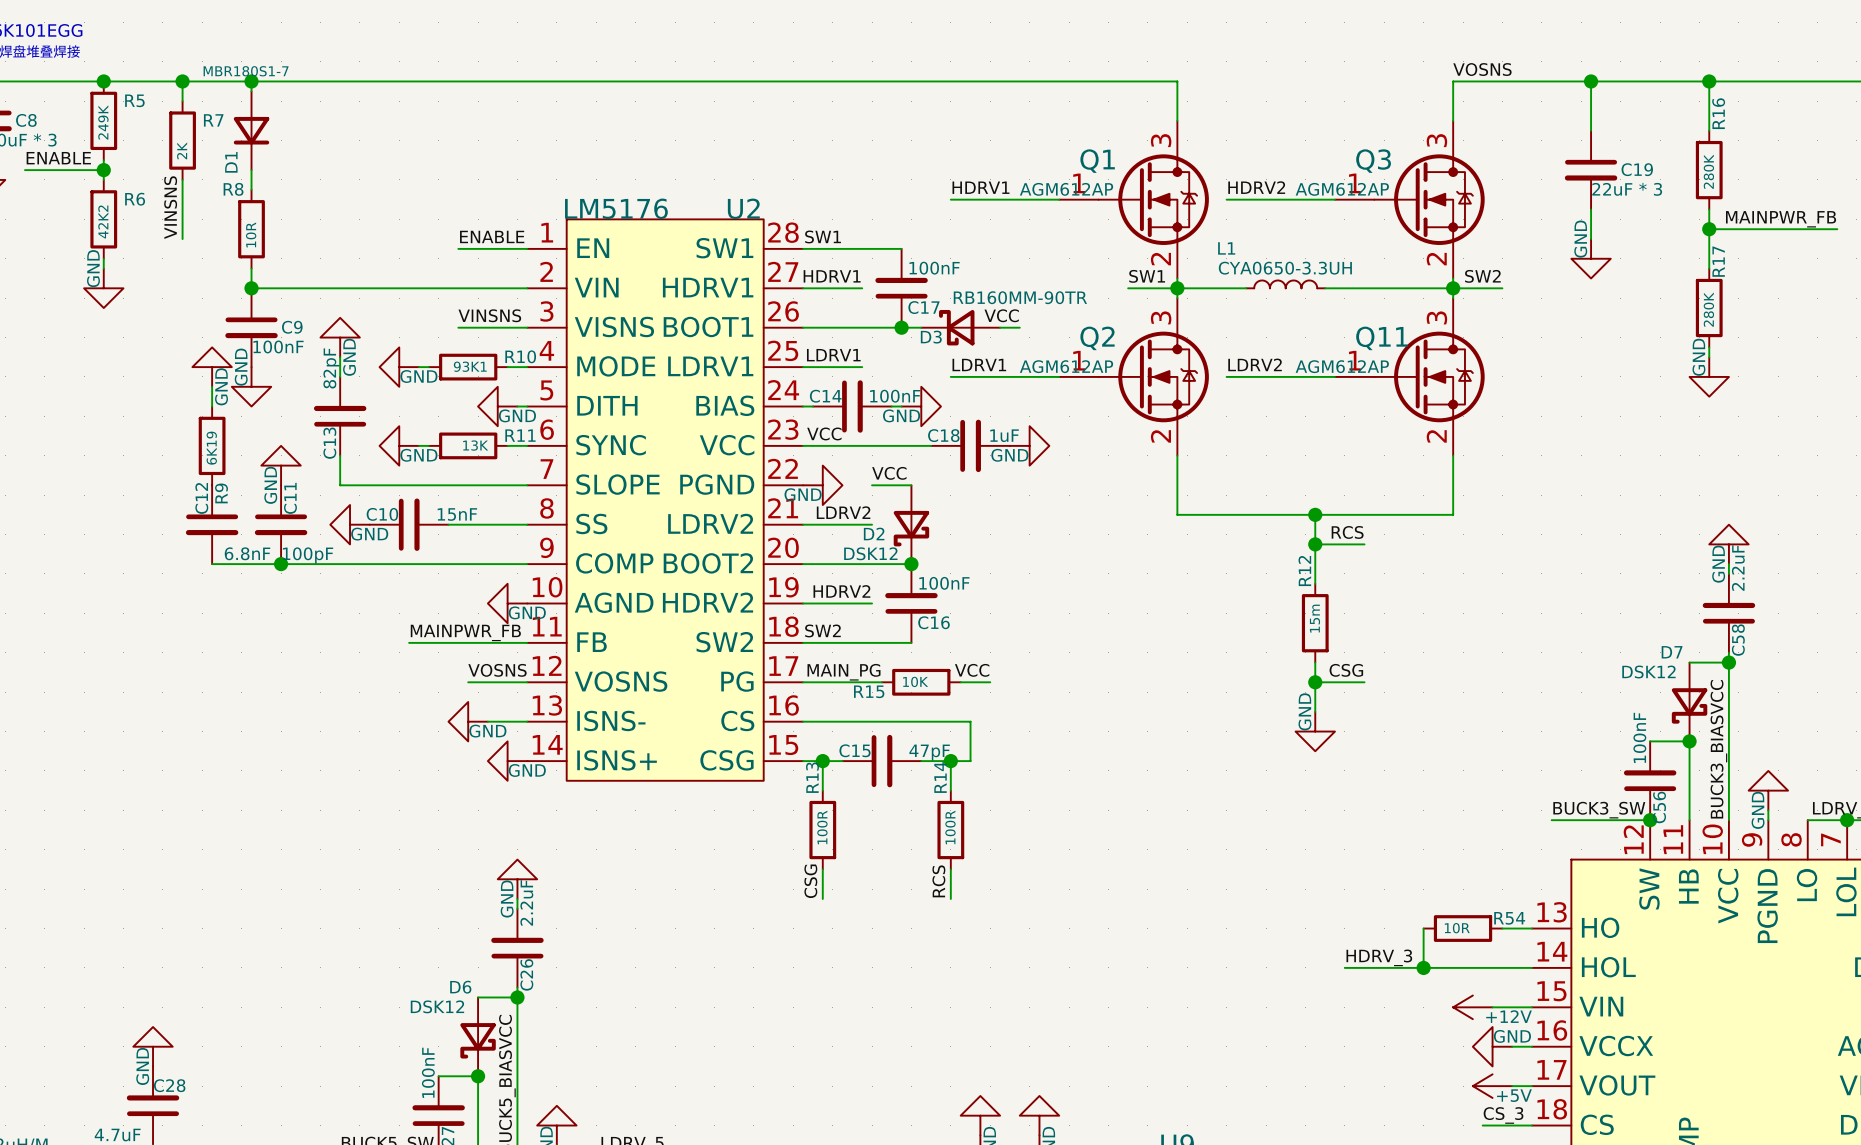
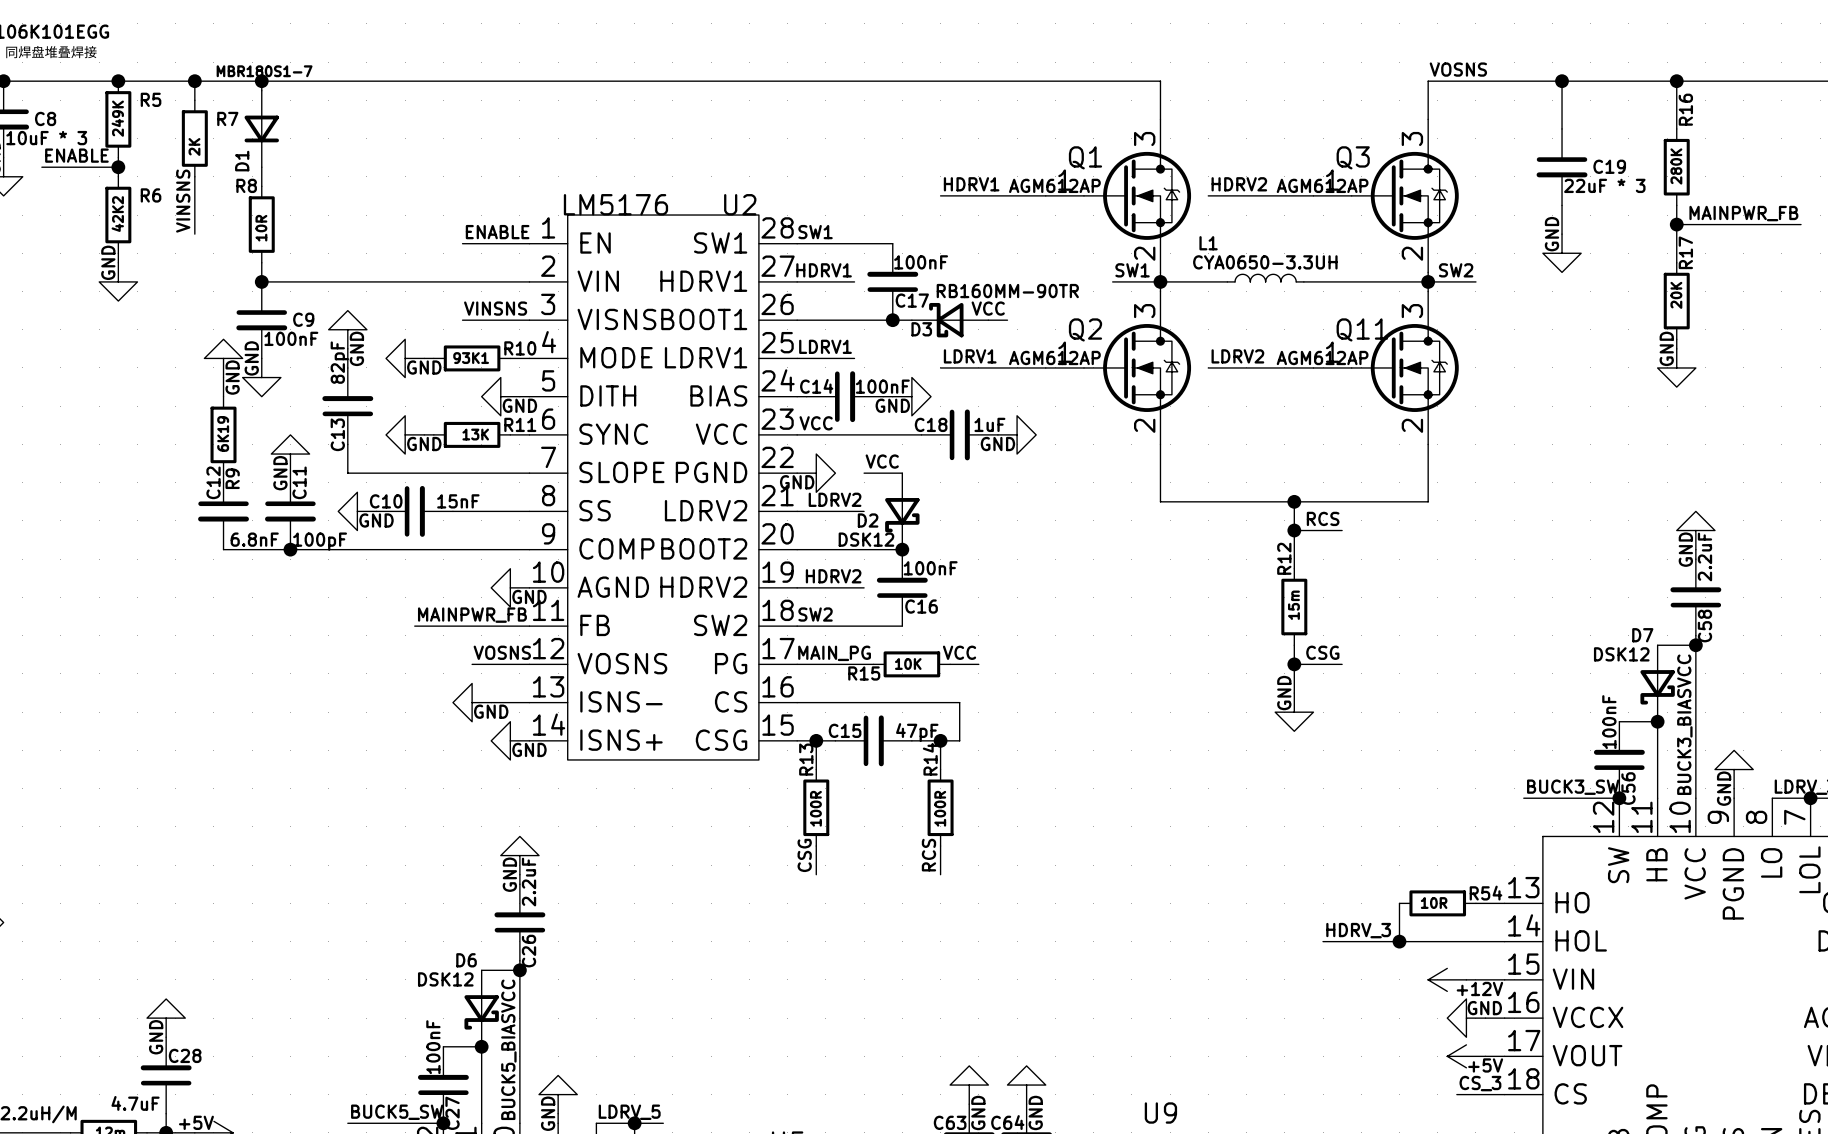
R17 value: 280K (1708, 309) -> 20K (1676, 295)

